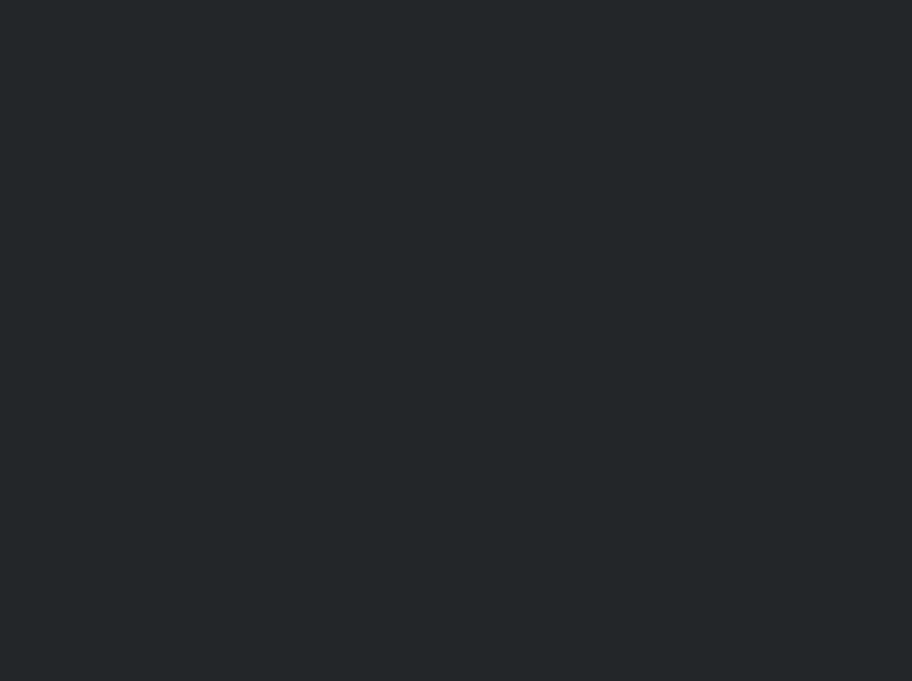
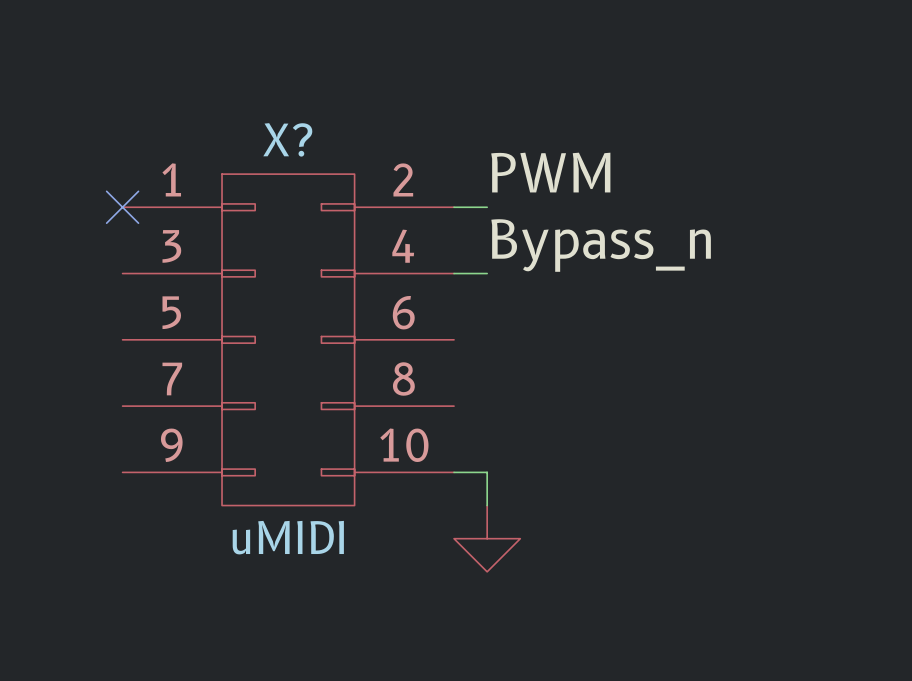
label: none -> PWM (550, 172)
no-connect mark: none -> (122, 207)
wire: none -> (454, 207) (487, 207)
label: none -> Bypass_n (601, 245)
wire: none -> (454, 273) (487, 273)
X?: none -> uMIDI (288, 339)
wire: none -> (454, 472) (487, 472) (487, 505)
power symbol: none -> (487, 538)

